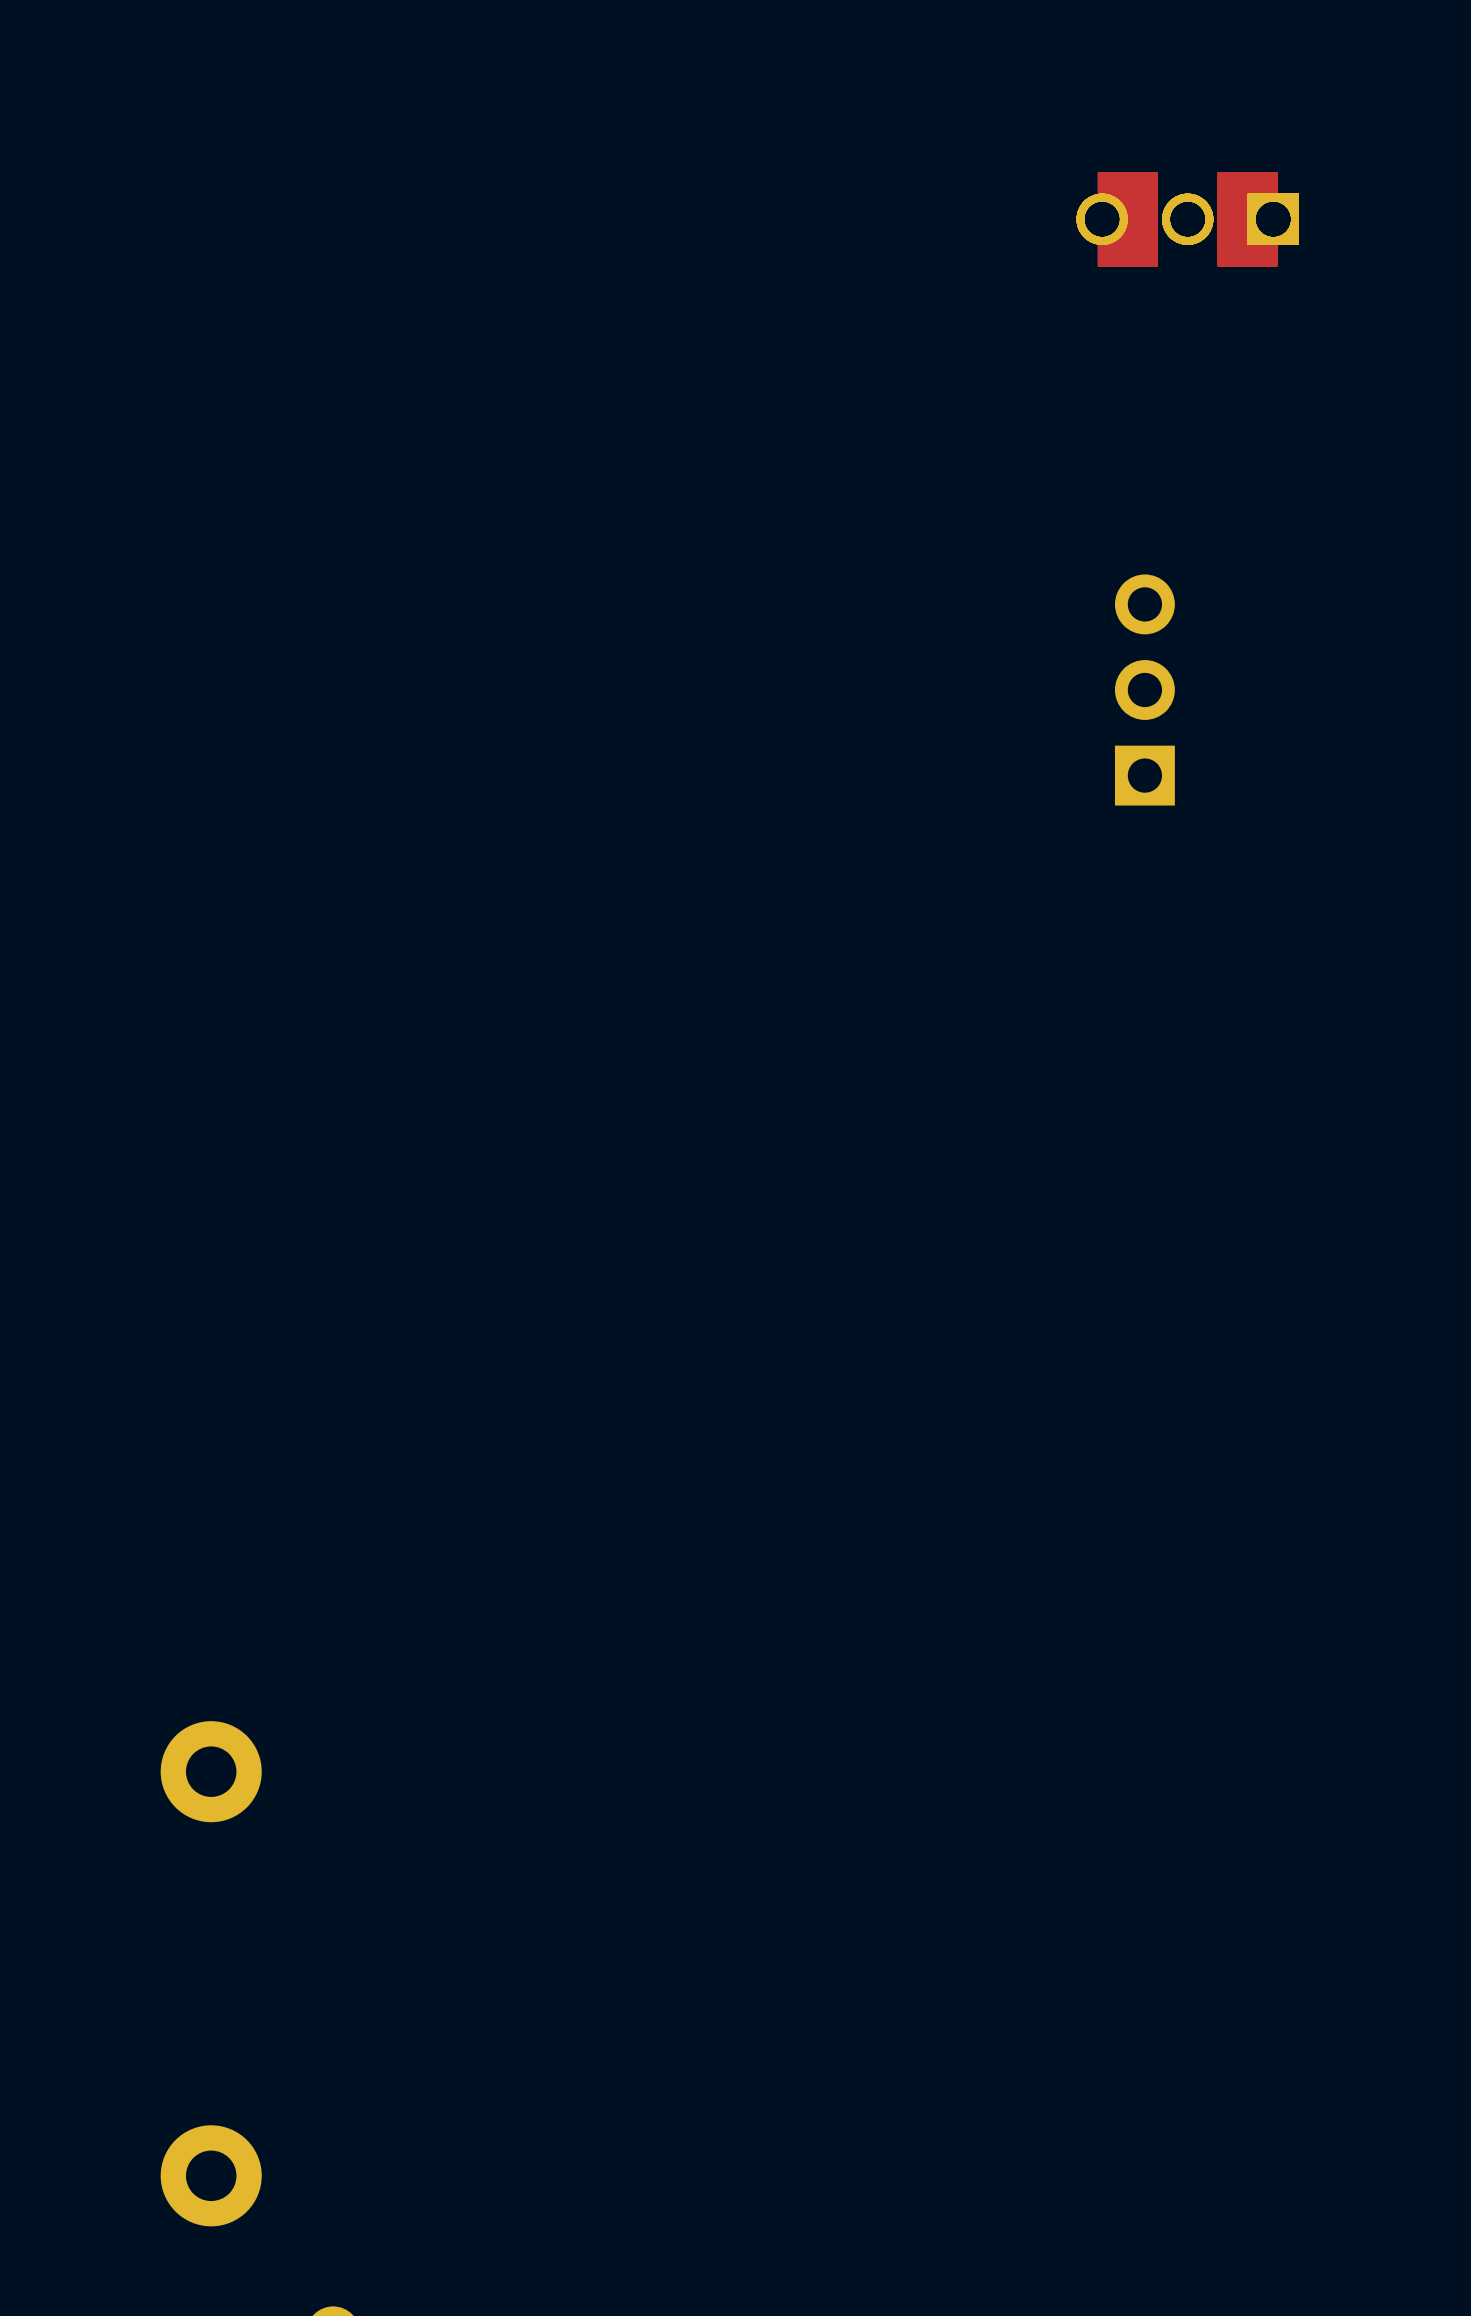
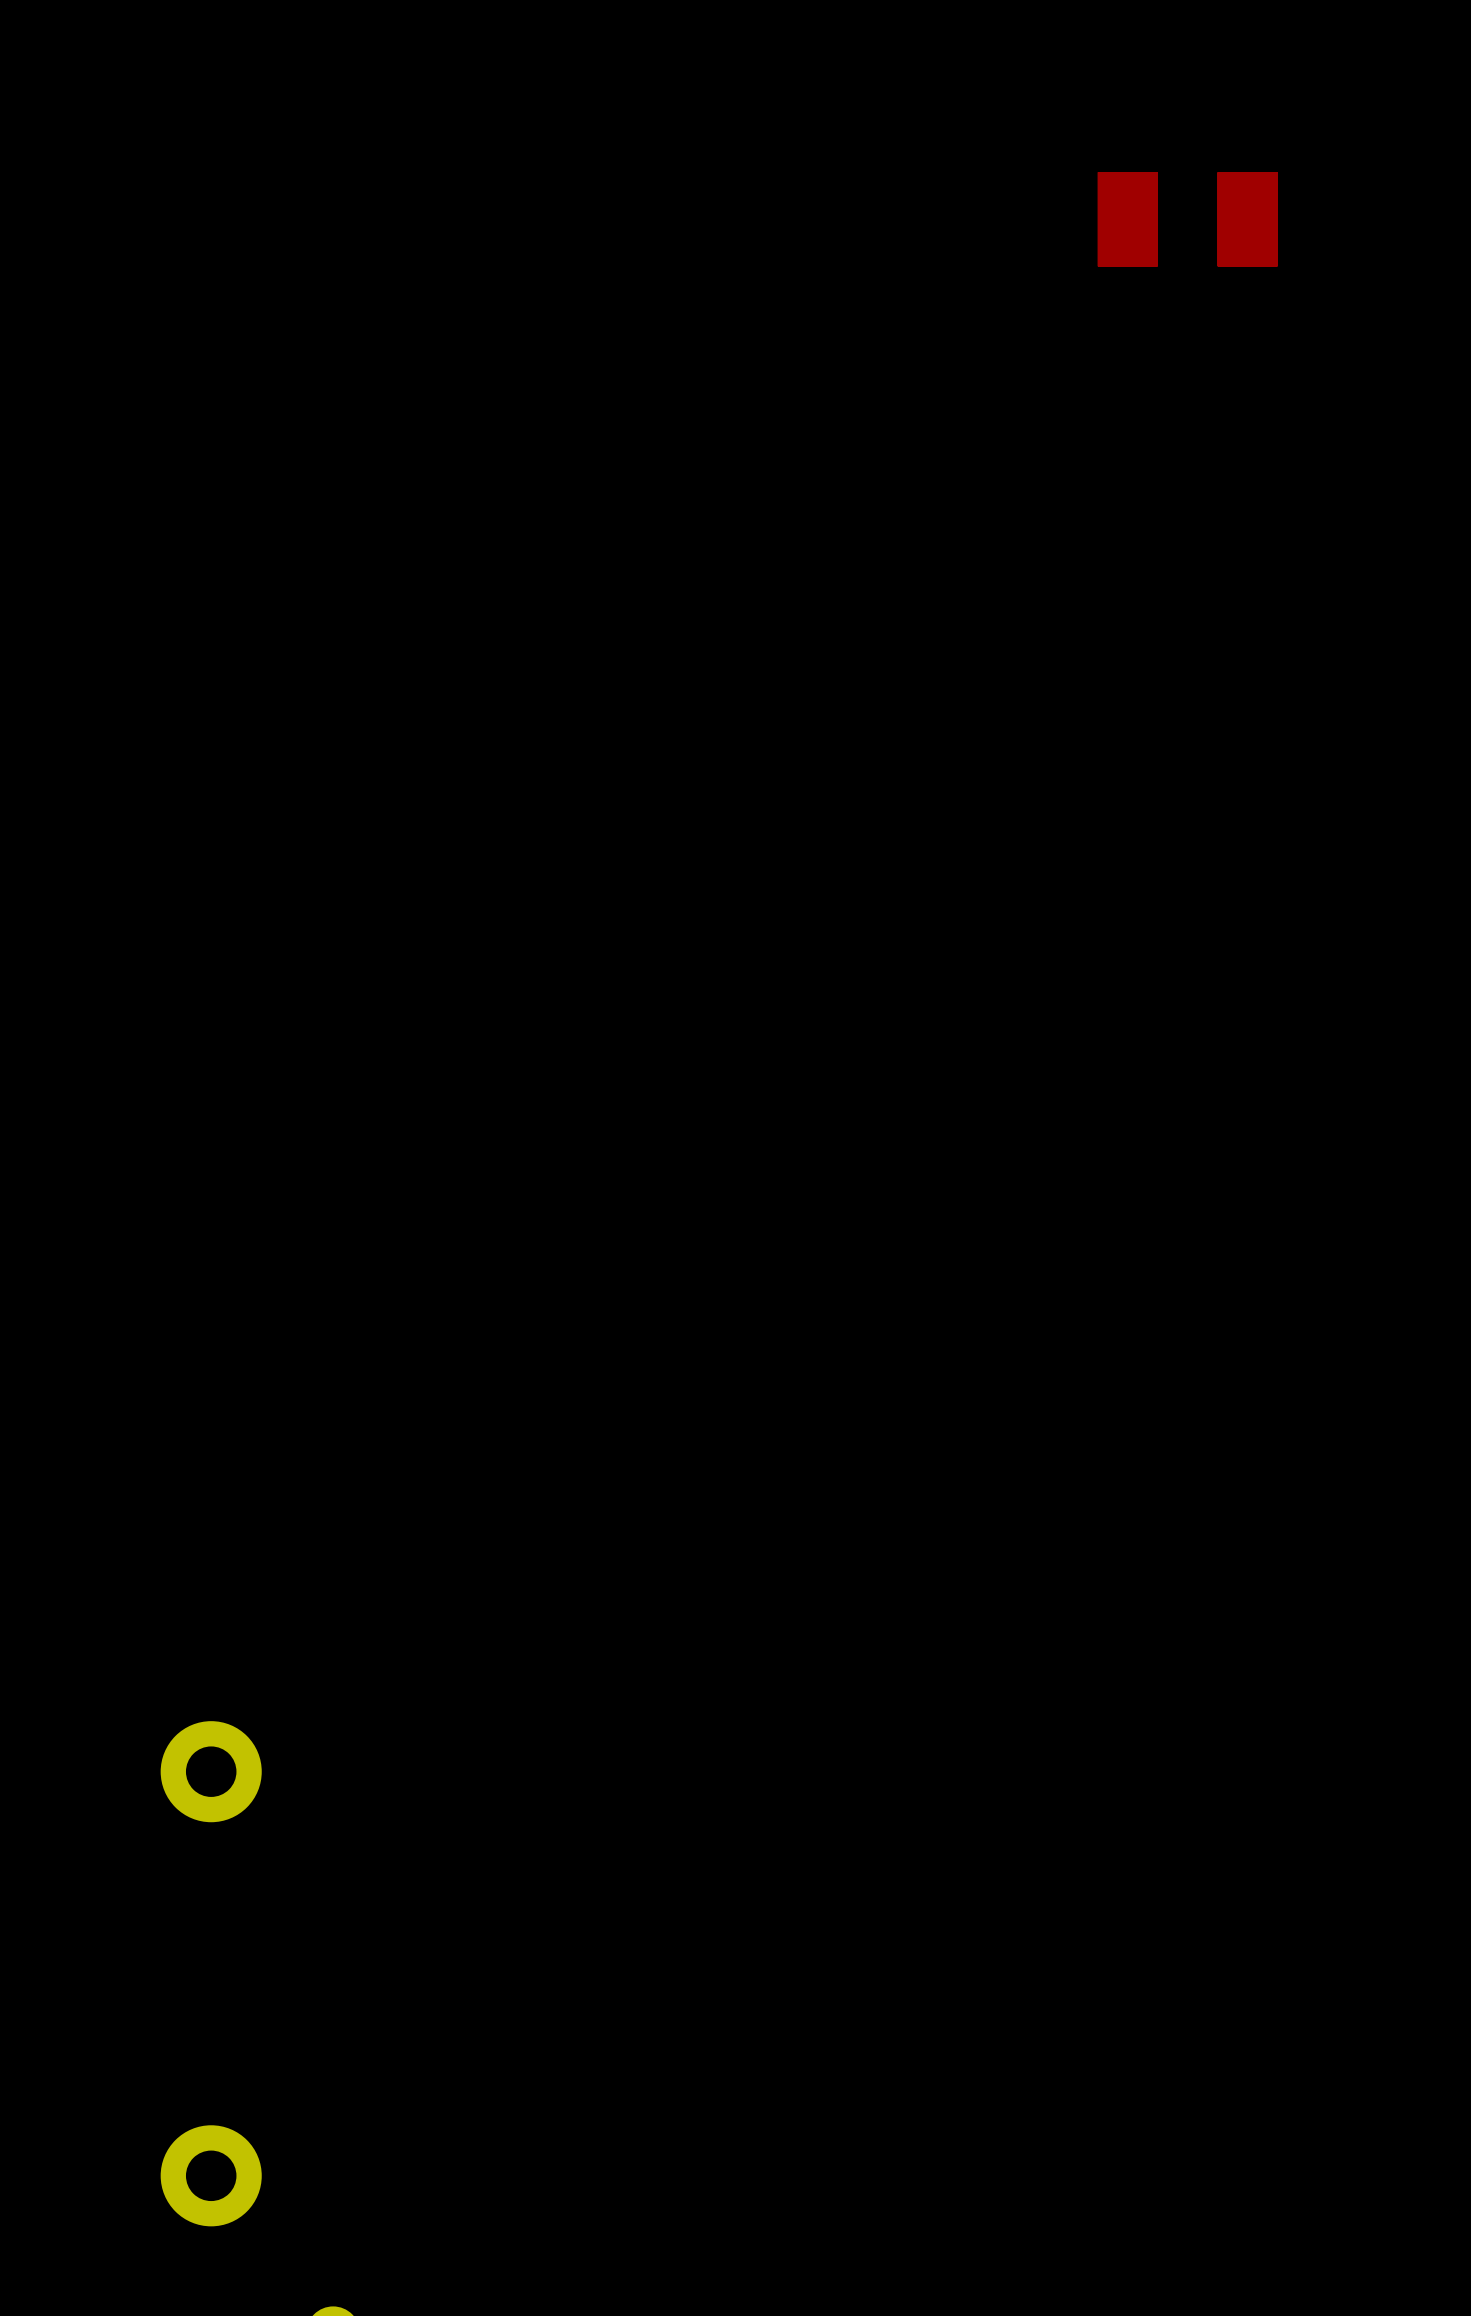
part: (1187, 219) -> none
part: (1144, 689) -> none

